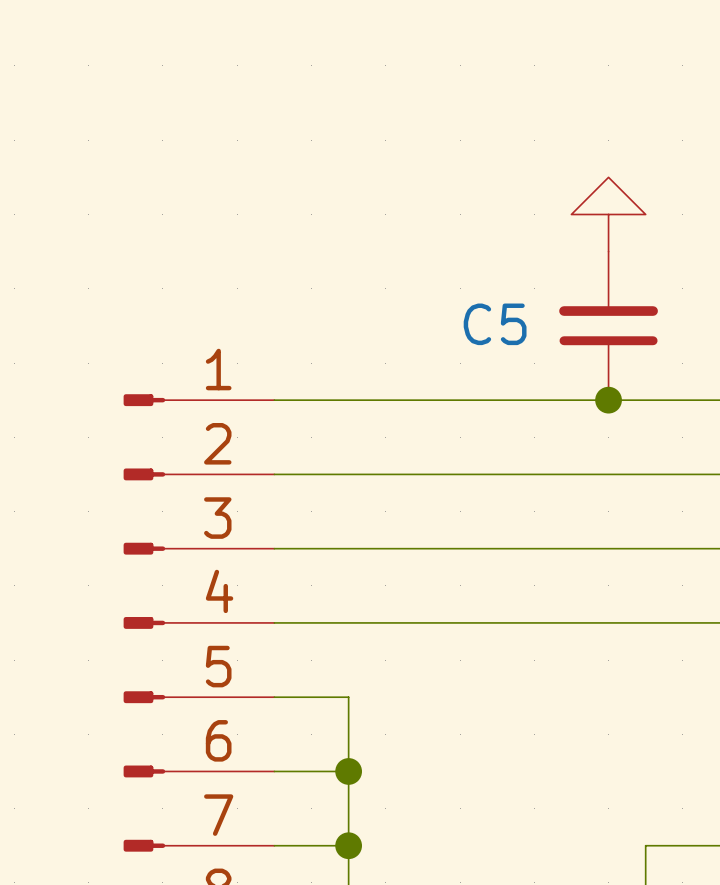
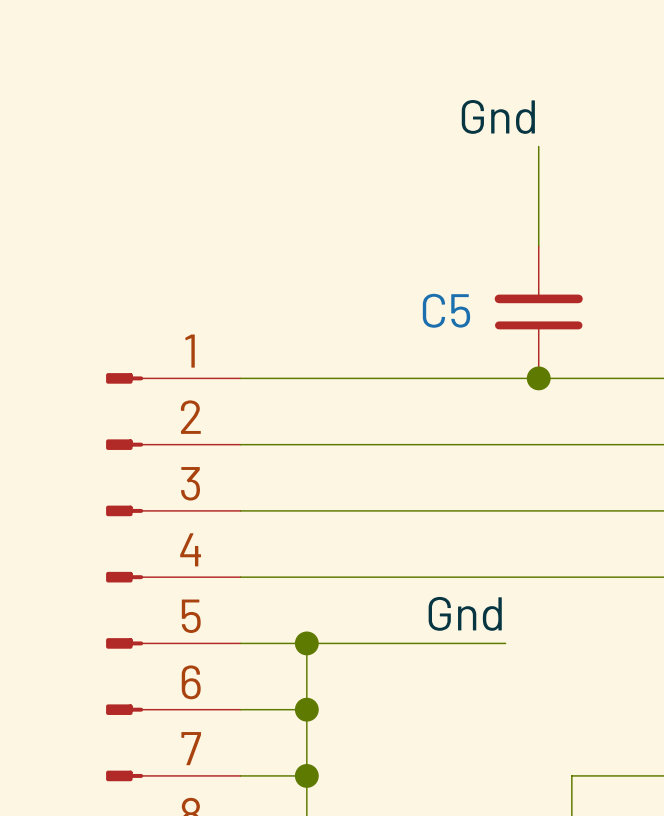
label: none -> Gnd (498, 116)
wire: none -> (538, 146) (538, 245)
power symbol: (608, 214) -> none
label: none -> Gnd (465, 613)
wire: none -> (306, 643) (505, 643)
junction: none -> (306, 643)

